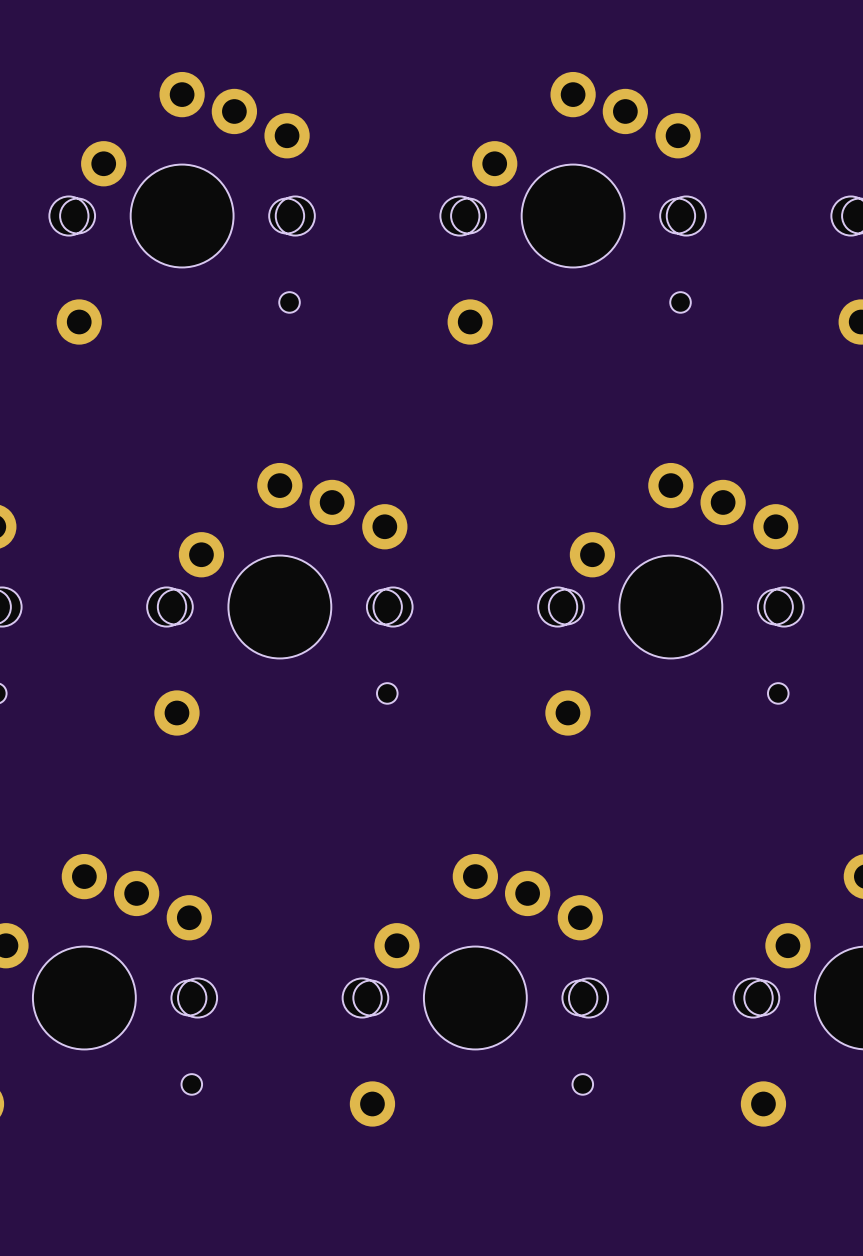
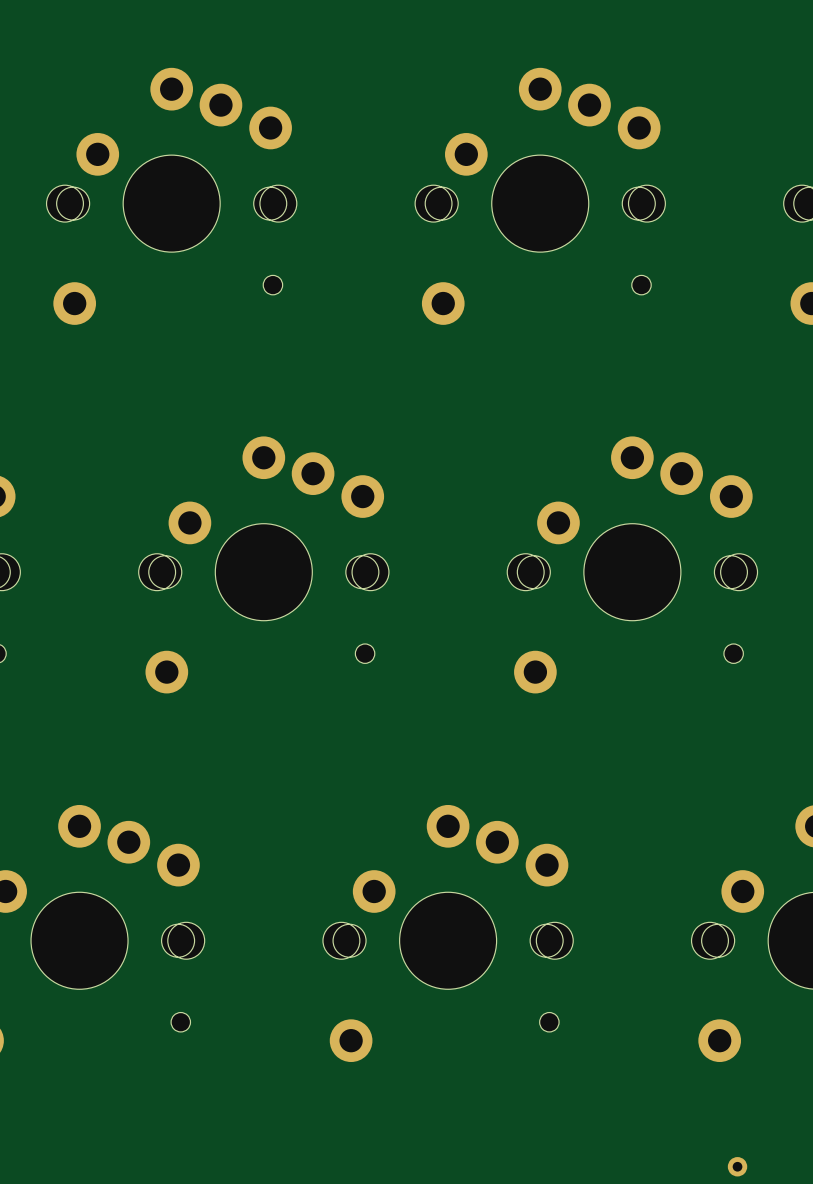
part: none -> (737, 1166)

